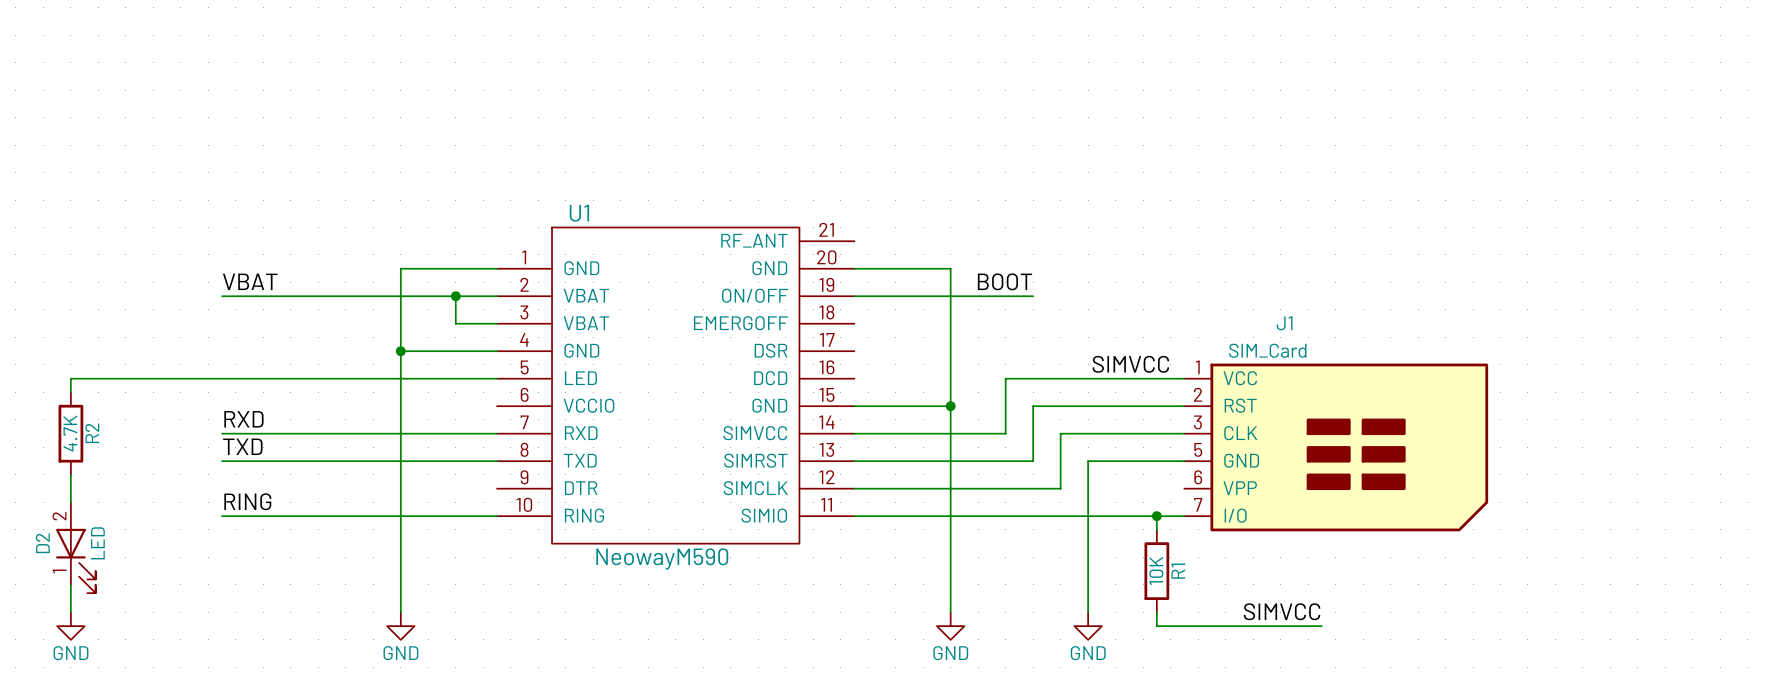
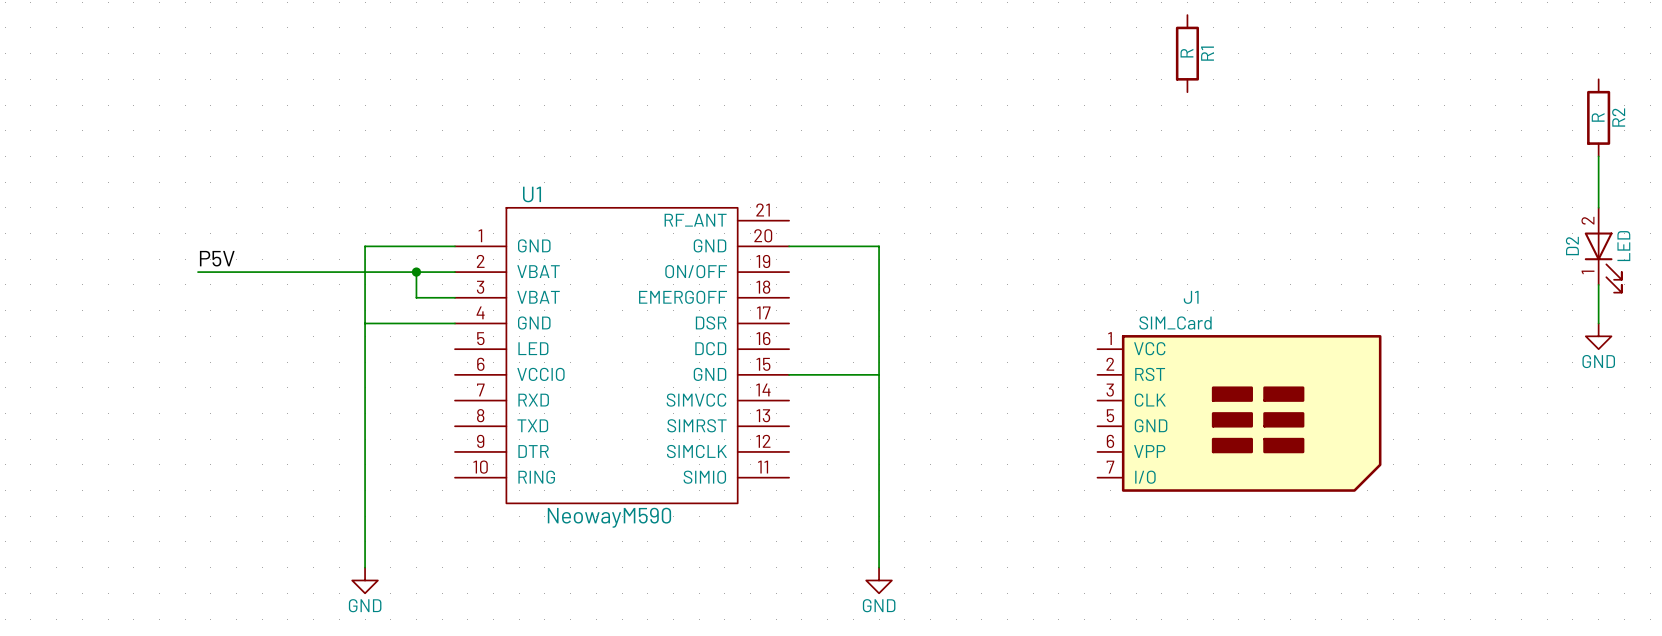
wire: none -> (1598, 156) (1598, 207)
label: VBAT (250, 281) -> P5V (217, 258)
label: BOOT (1004, 281) -> none
wire: (854, 296) (1033, 296) -> none
wire: none -> (1598, 284) (1598, 323)
junction: (400, 351) -> none
label: SIMVCC (1130, 364) -> none
power symbol: none -> GND (1598, 336)
wire: (497, 378) (70, 378) (70, 392) -> none
wire: (1184, 378) (1005, 378) (1005, 433) (854, 433) -> none
junction: (950, 406) -> none
wire: (1184, 406) (1033, 406) (1033, 461) (854, 461) -> none
label: RXD (243, 419) -> none
R2 position: (70, 433) -> (1598, 117)
R2 value: 4.7K (70, 433) -> R (1598, 117)
wire: (222, 433) (497, 433) -> none
wire: (1184, 433) (1060, 433) (1060, 488) (854, 488) -> none
label: TXD (242, 446) -> none
wire: (222, 461) (497, 461) -> none
wire: (1184, 461) (1088, 461) (1088, 612) -> none
wire: (70, 474) (70, 502) -> none
label: RING (247, 501) -> none
wire: (222, 516) (497, 516) -> none
wire: (854, 516) (1184, 516) -> none
wire: (1156, 516) (1156, 529) -> none
junction: (1156, 516) -> none
D2 position: (75, 547) -> (1603, 250)
R1 value: 10K (1156, 570) -> R (1186, 53)
R1 position: (1156, 571) -> (1187, 53)
wire: (70, 584) (70, 612) -> none
label: SIMVCC (1282, 611) -> none
wire: (1156, 612) (1156, 626) (1321, 626) -> none
power symbol: GND (70, 626) -> none
power symbol: GND (1088, 626) -> none

